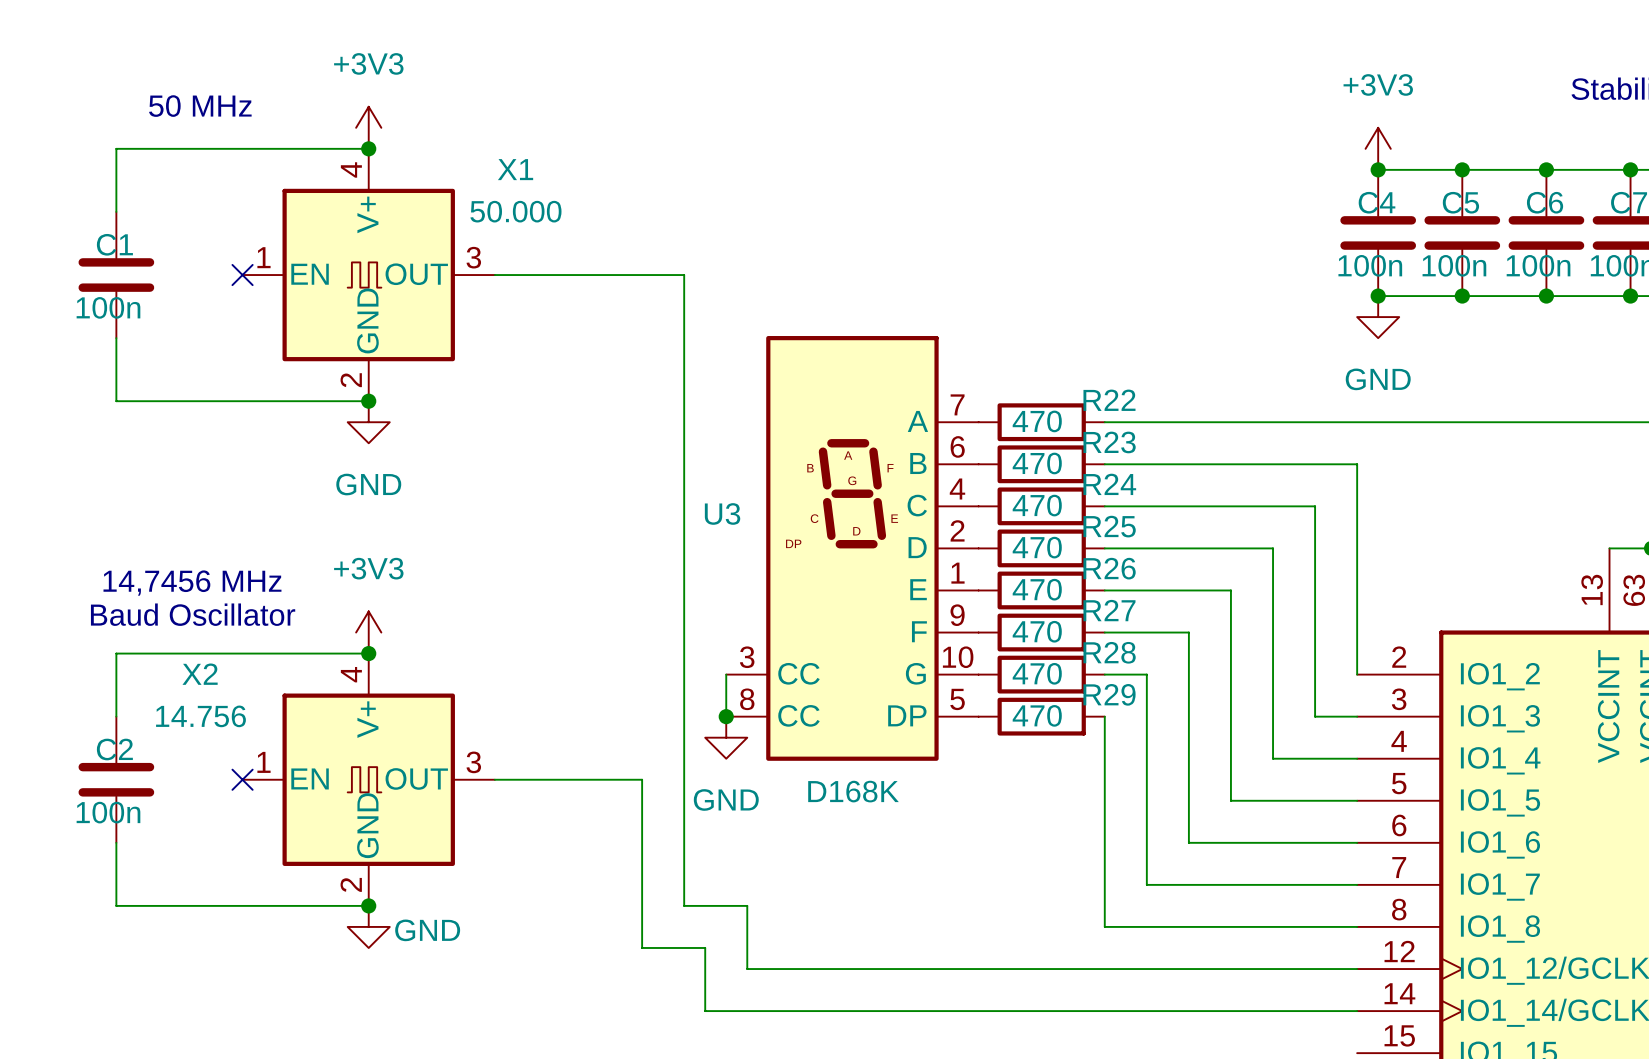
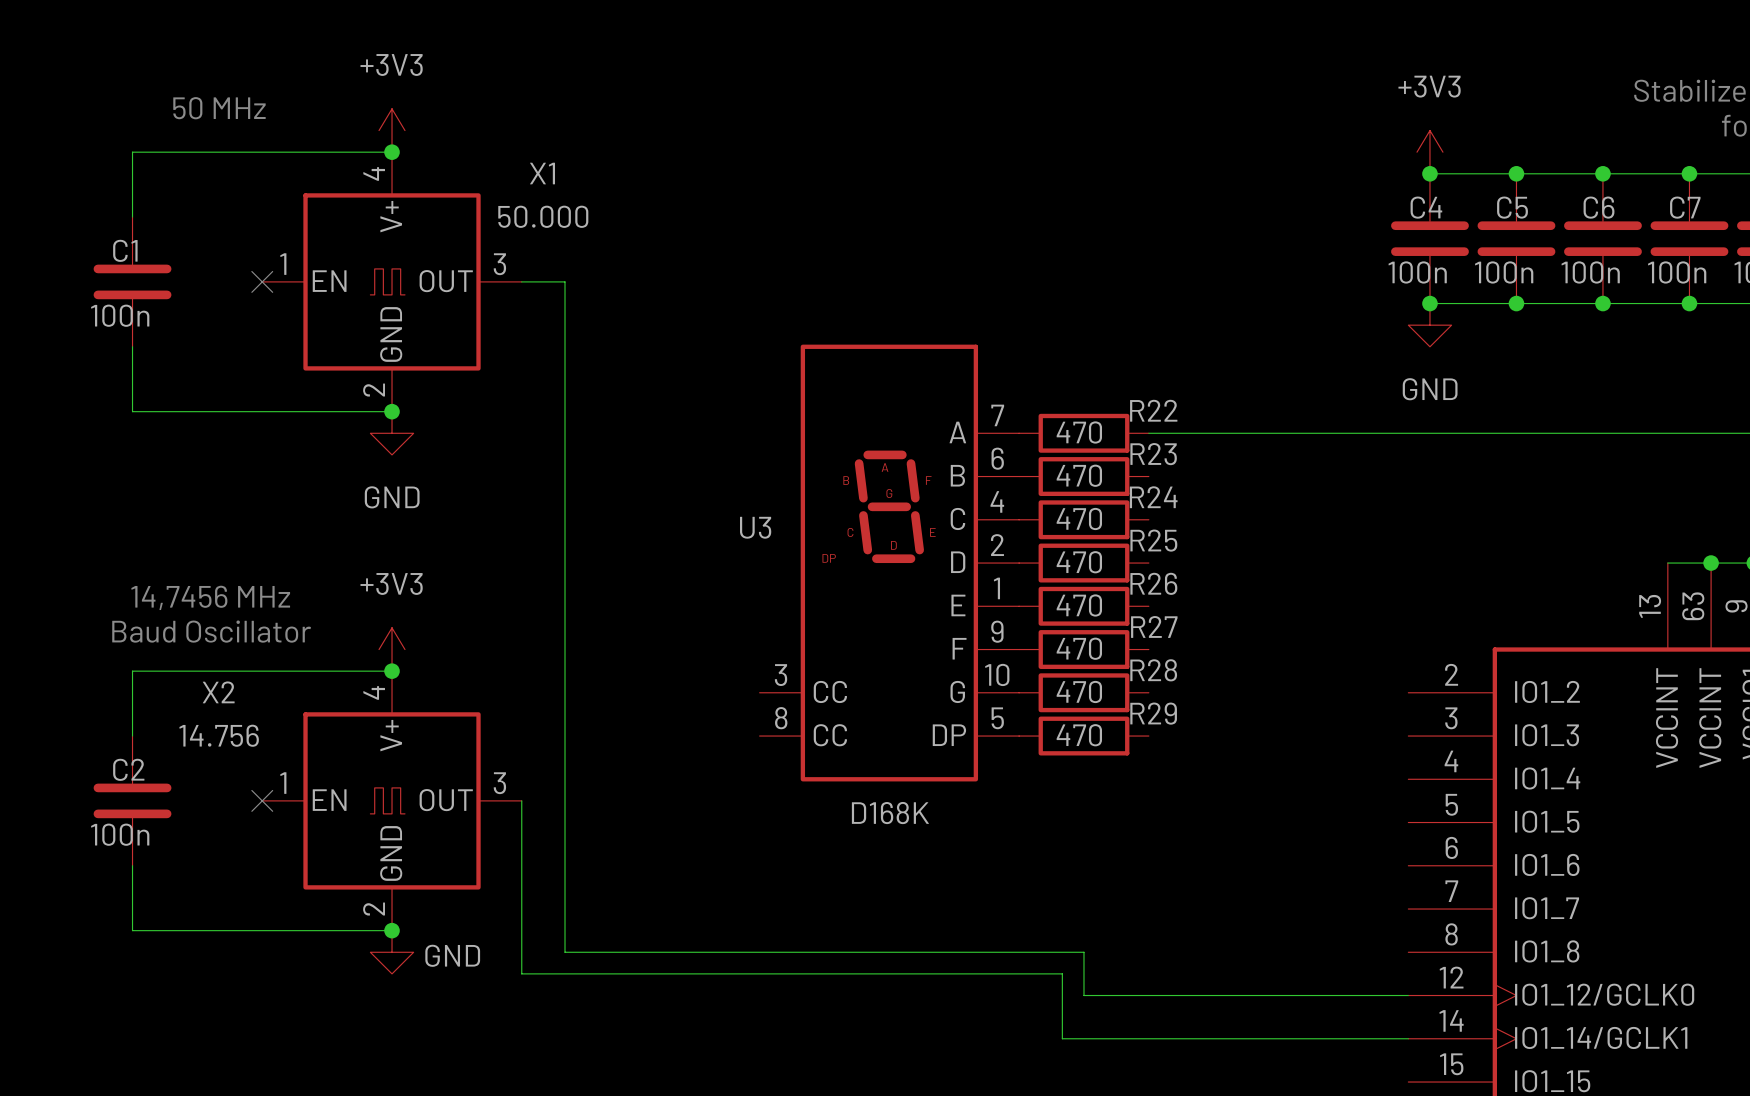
wire: (536, 275) (684, 275) (684, 905) (747, 905) (747, 969) (1041, 969) -> (565, 281) (565, 952) (1083, 952) (1083, 995)
wire: (1104, 464) (1357, 464) (1357, 674) -> none
wire: (1104, 506) (1315, 506) (1315, 716) (1357, 716) -> none
wire: (1104, 548) (1273, 548) (1273, 758) (1357, 758) -> none
wire: (1104, 590) (1230, 590) (1230, 800) (1357, 800) -> none
wire: (1104, 632) (1188, 632) (1188, 842) (1357, 842) -> none
wire: (726, 674) (726, 716) -> none
wire: (1104, 674) (1146, 674) (1146, 884) (1357, 884) -> none
junction: (726, 716) -> none
wire: (1104, 716) (1104, 926) (1357, 926) -> none
power symbol: GND (726, 737) -> none
wire: (494, 779) (642, 779) (642, 947) -> (521, 800) (521, 973) (673, 973)
wire: (705, 947) (705, 1011) (1020, 1011) -> (738, 973) (1062, 973) (1062, 1038)

